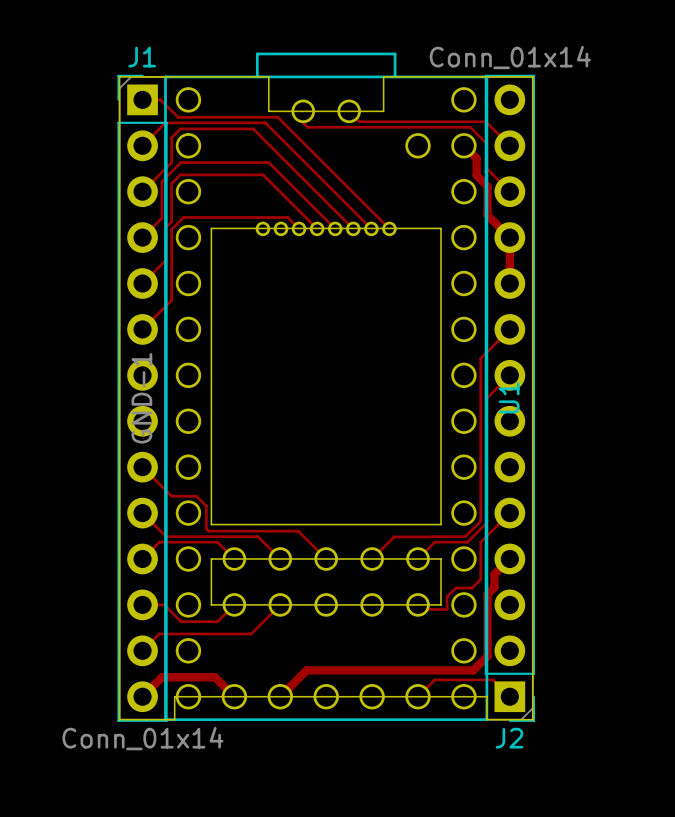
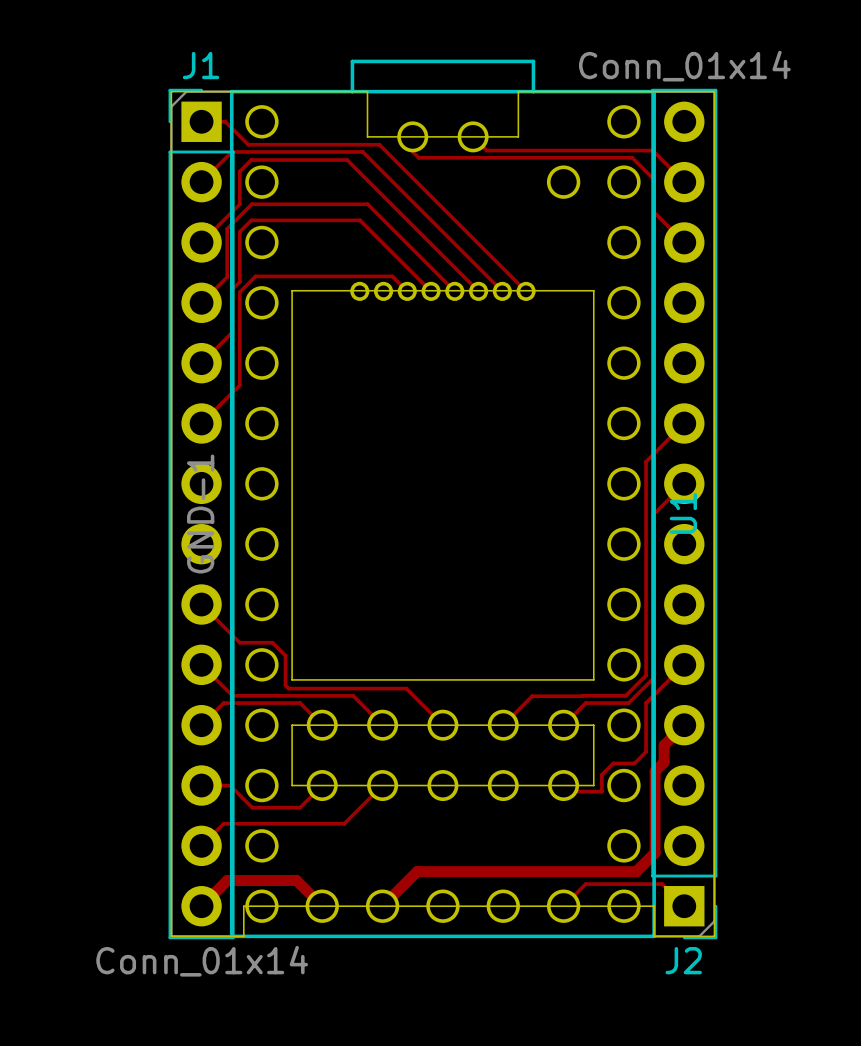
track: (463, 145) (476, 158) (476, 175) (487, 186) (487, 215) (509, 237) (509, 283) -> none

